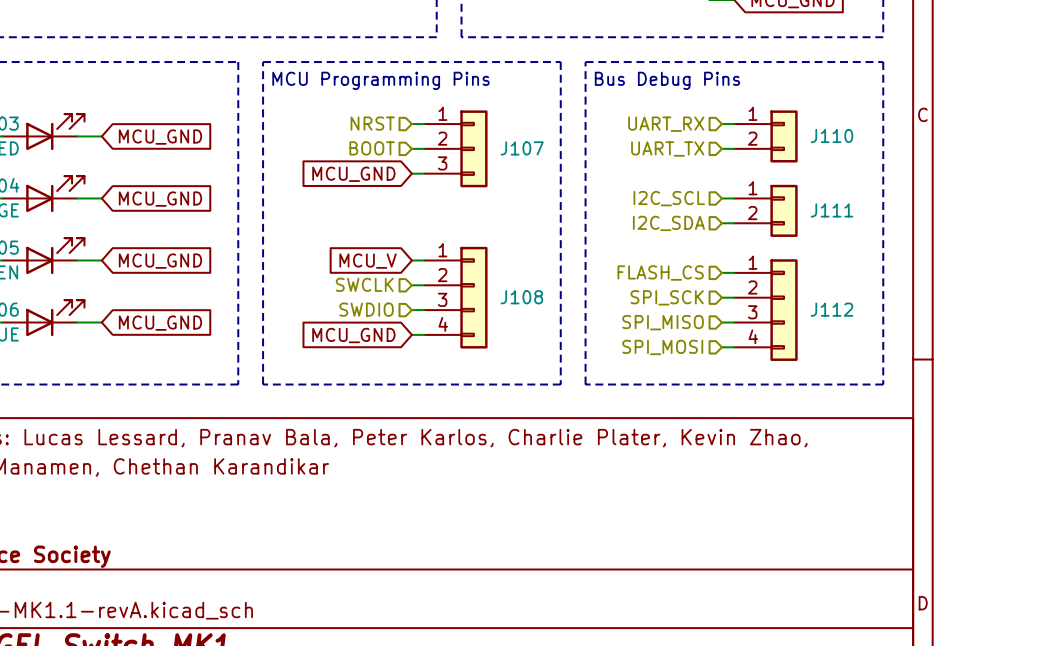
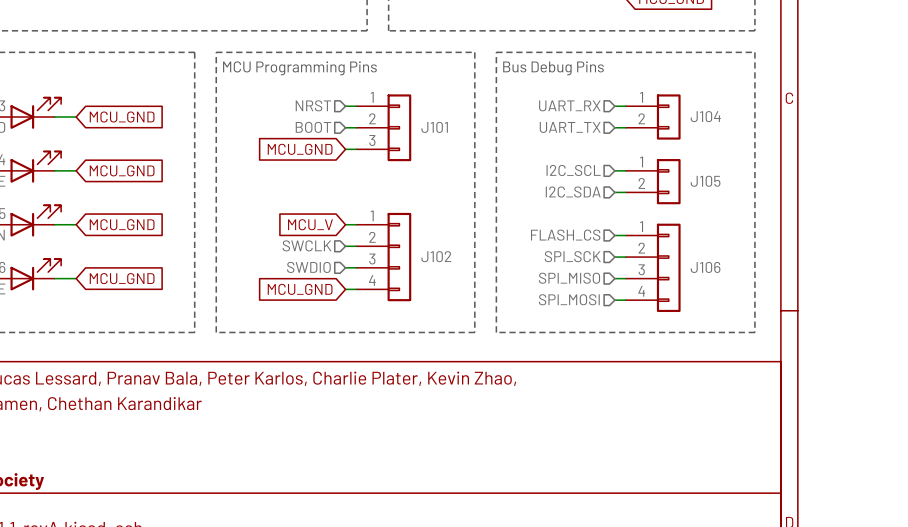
J110 name: J110 (831, 135) -> J104 (705, 116)
J107 name: J107 (522, 148) -> J101 (434, 127)
J111 name: J111 (831, 210) -> J105 (705, 181)
J108 name: J108 (521, 297) -> J102 (436, 256)
J112 name: J112 (831, 309) -> J106 (705, 267)

